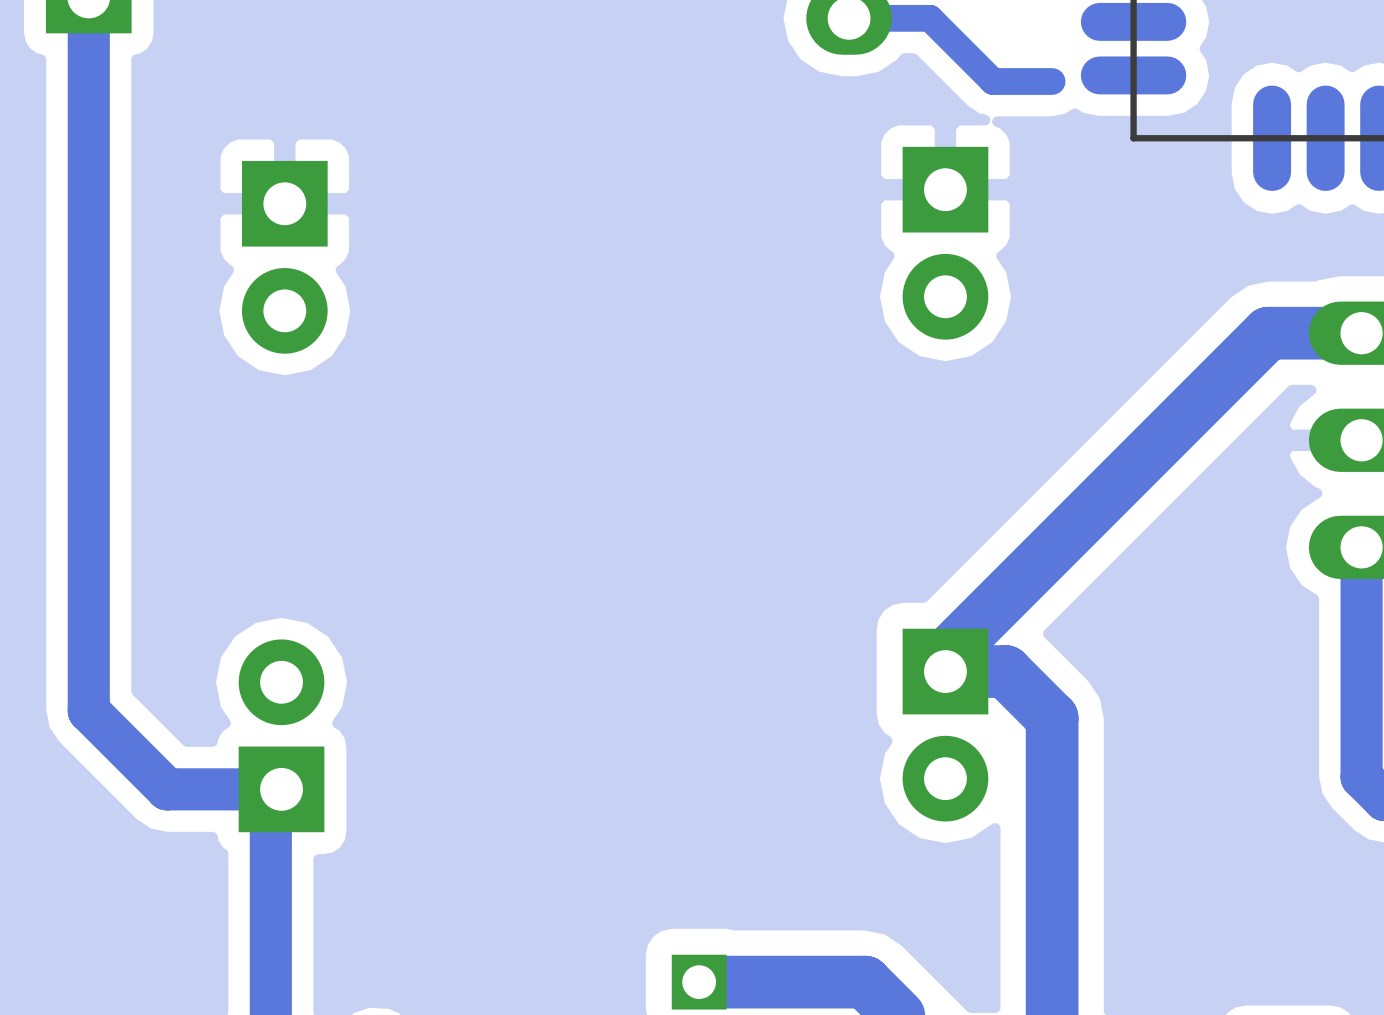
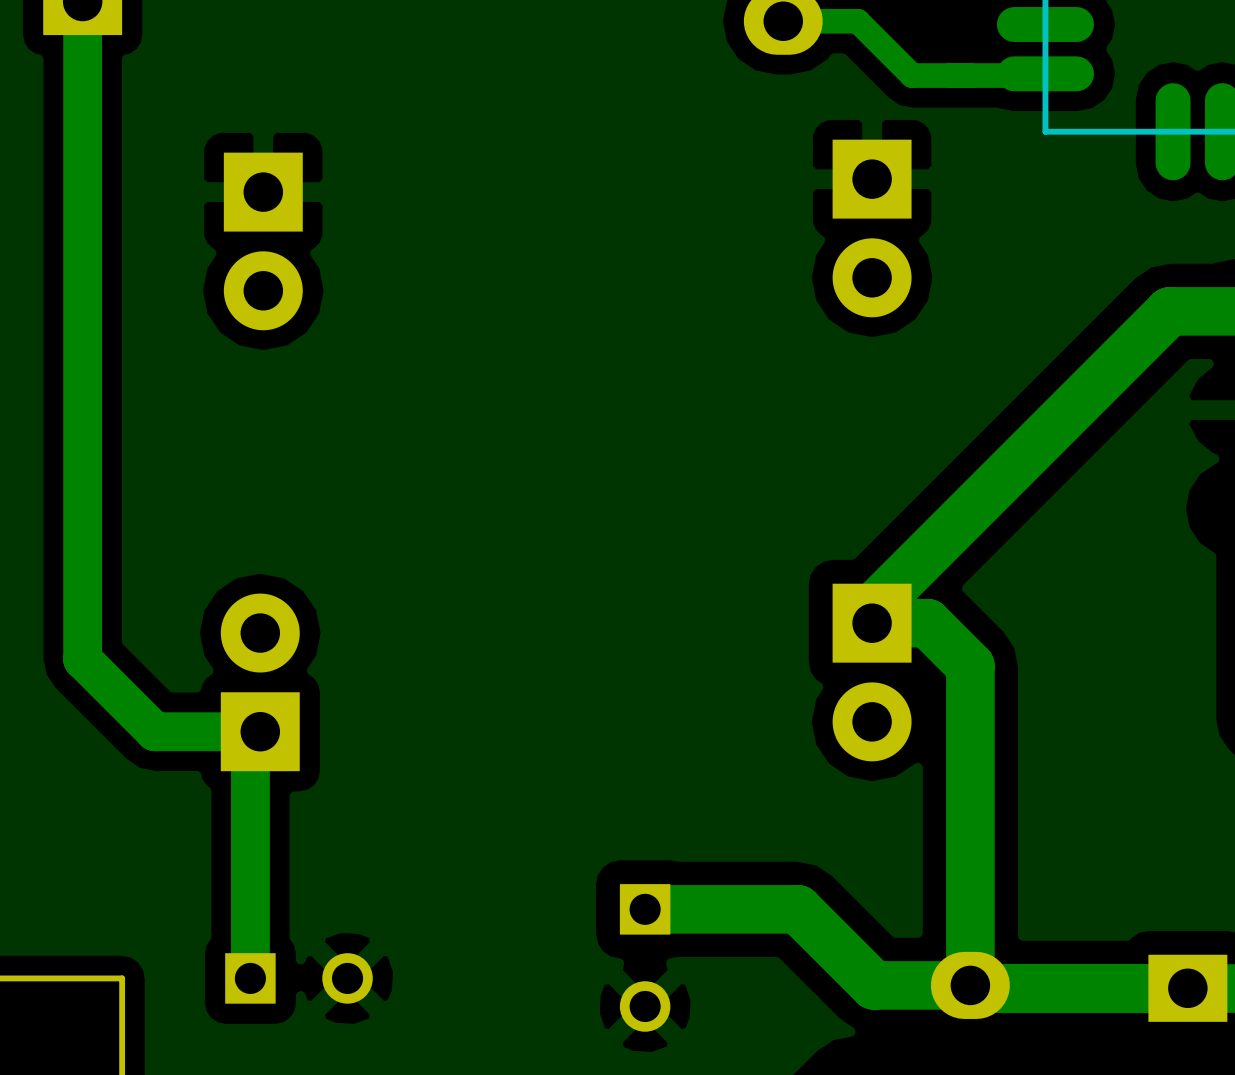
bottom track: (988, 77) (993, 81) (1052, 81) -> (912, 75) (1043, 75) (1045, 73)

